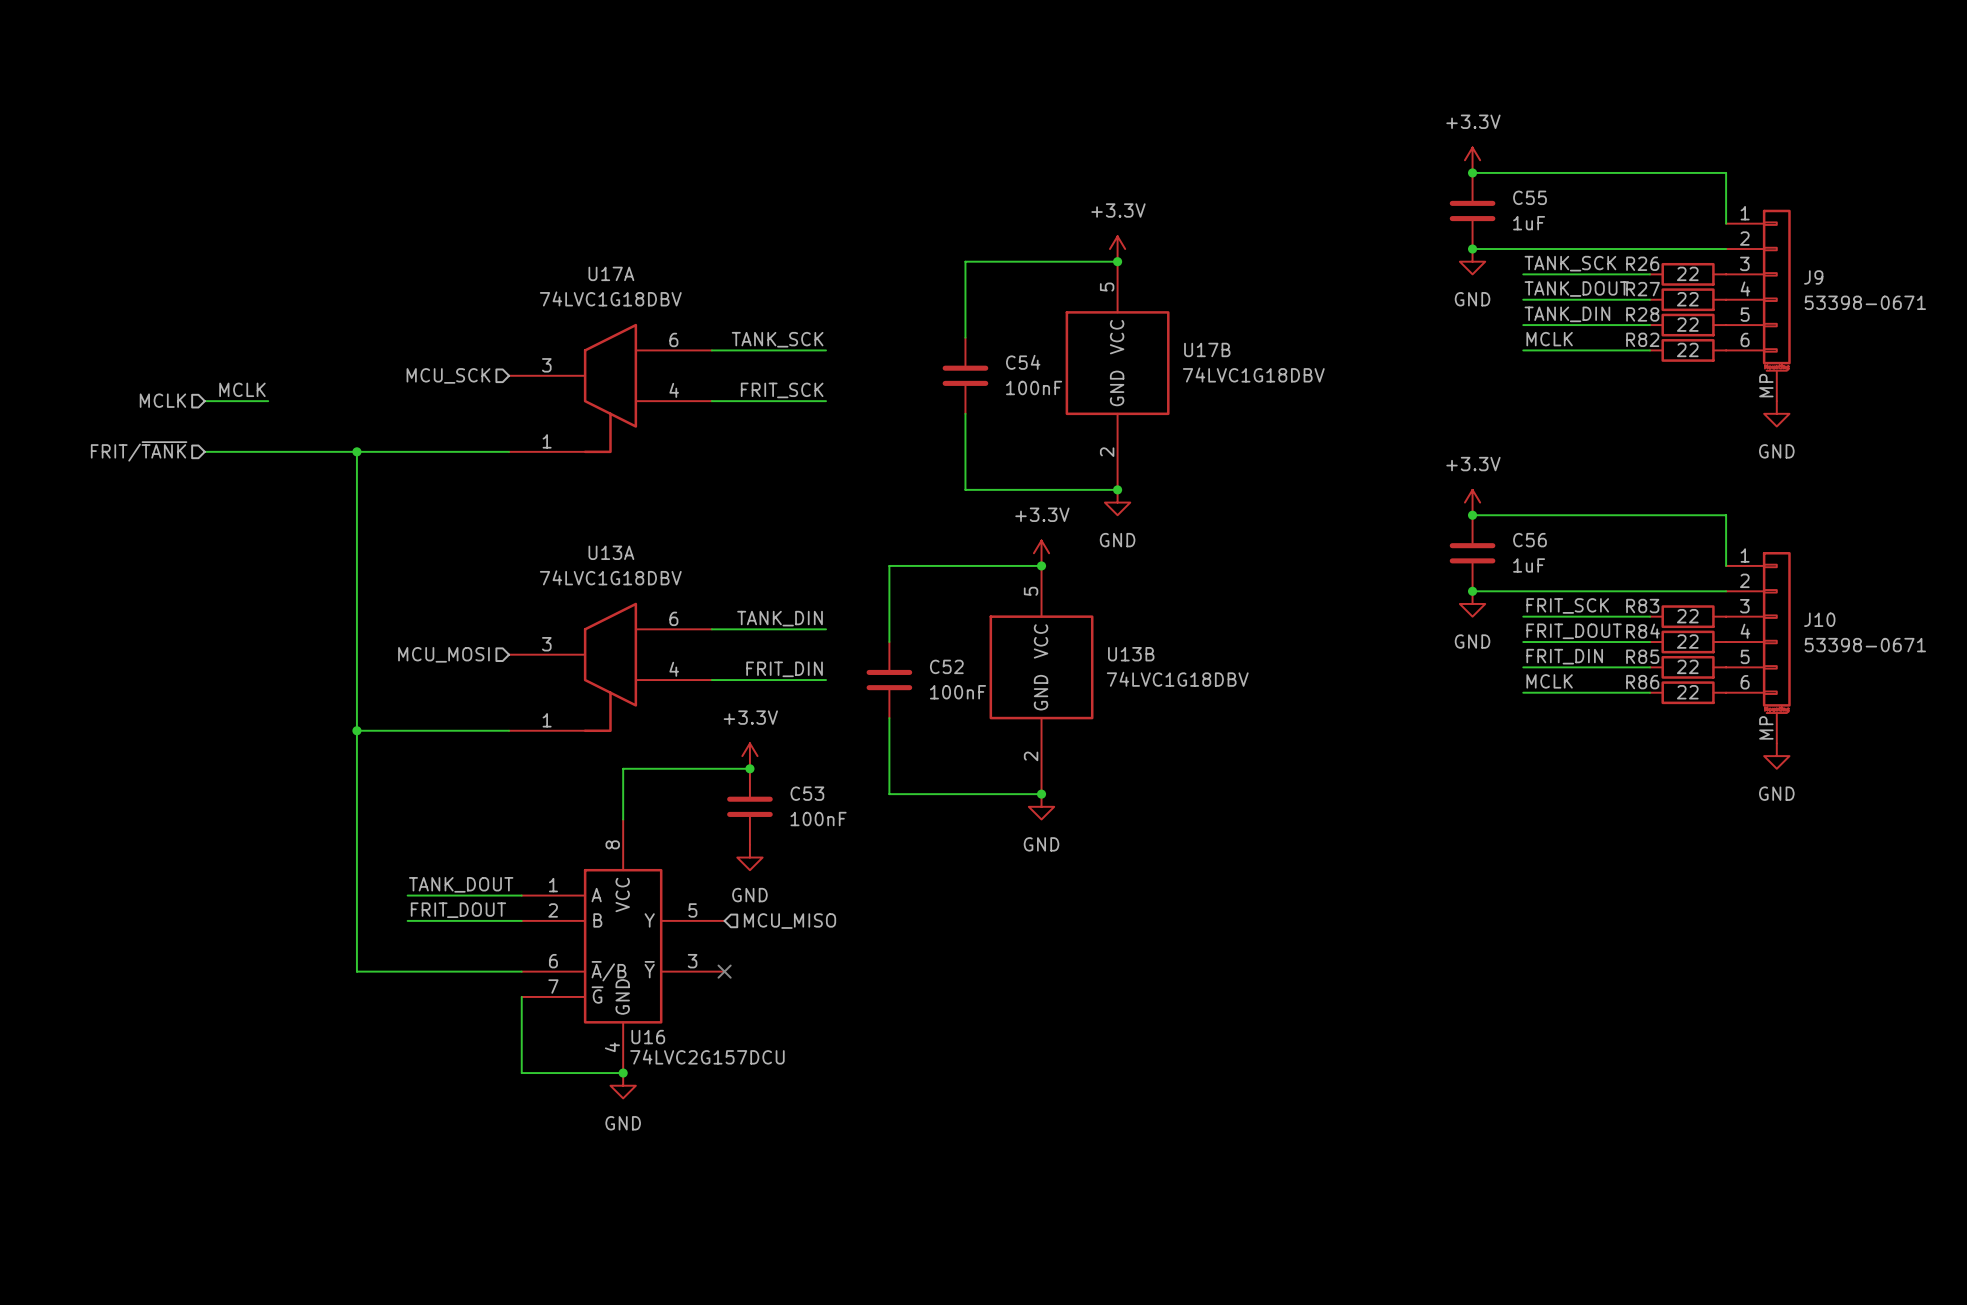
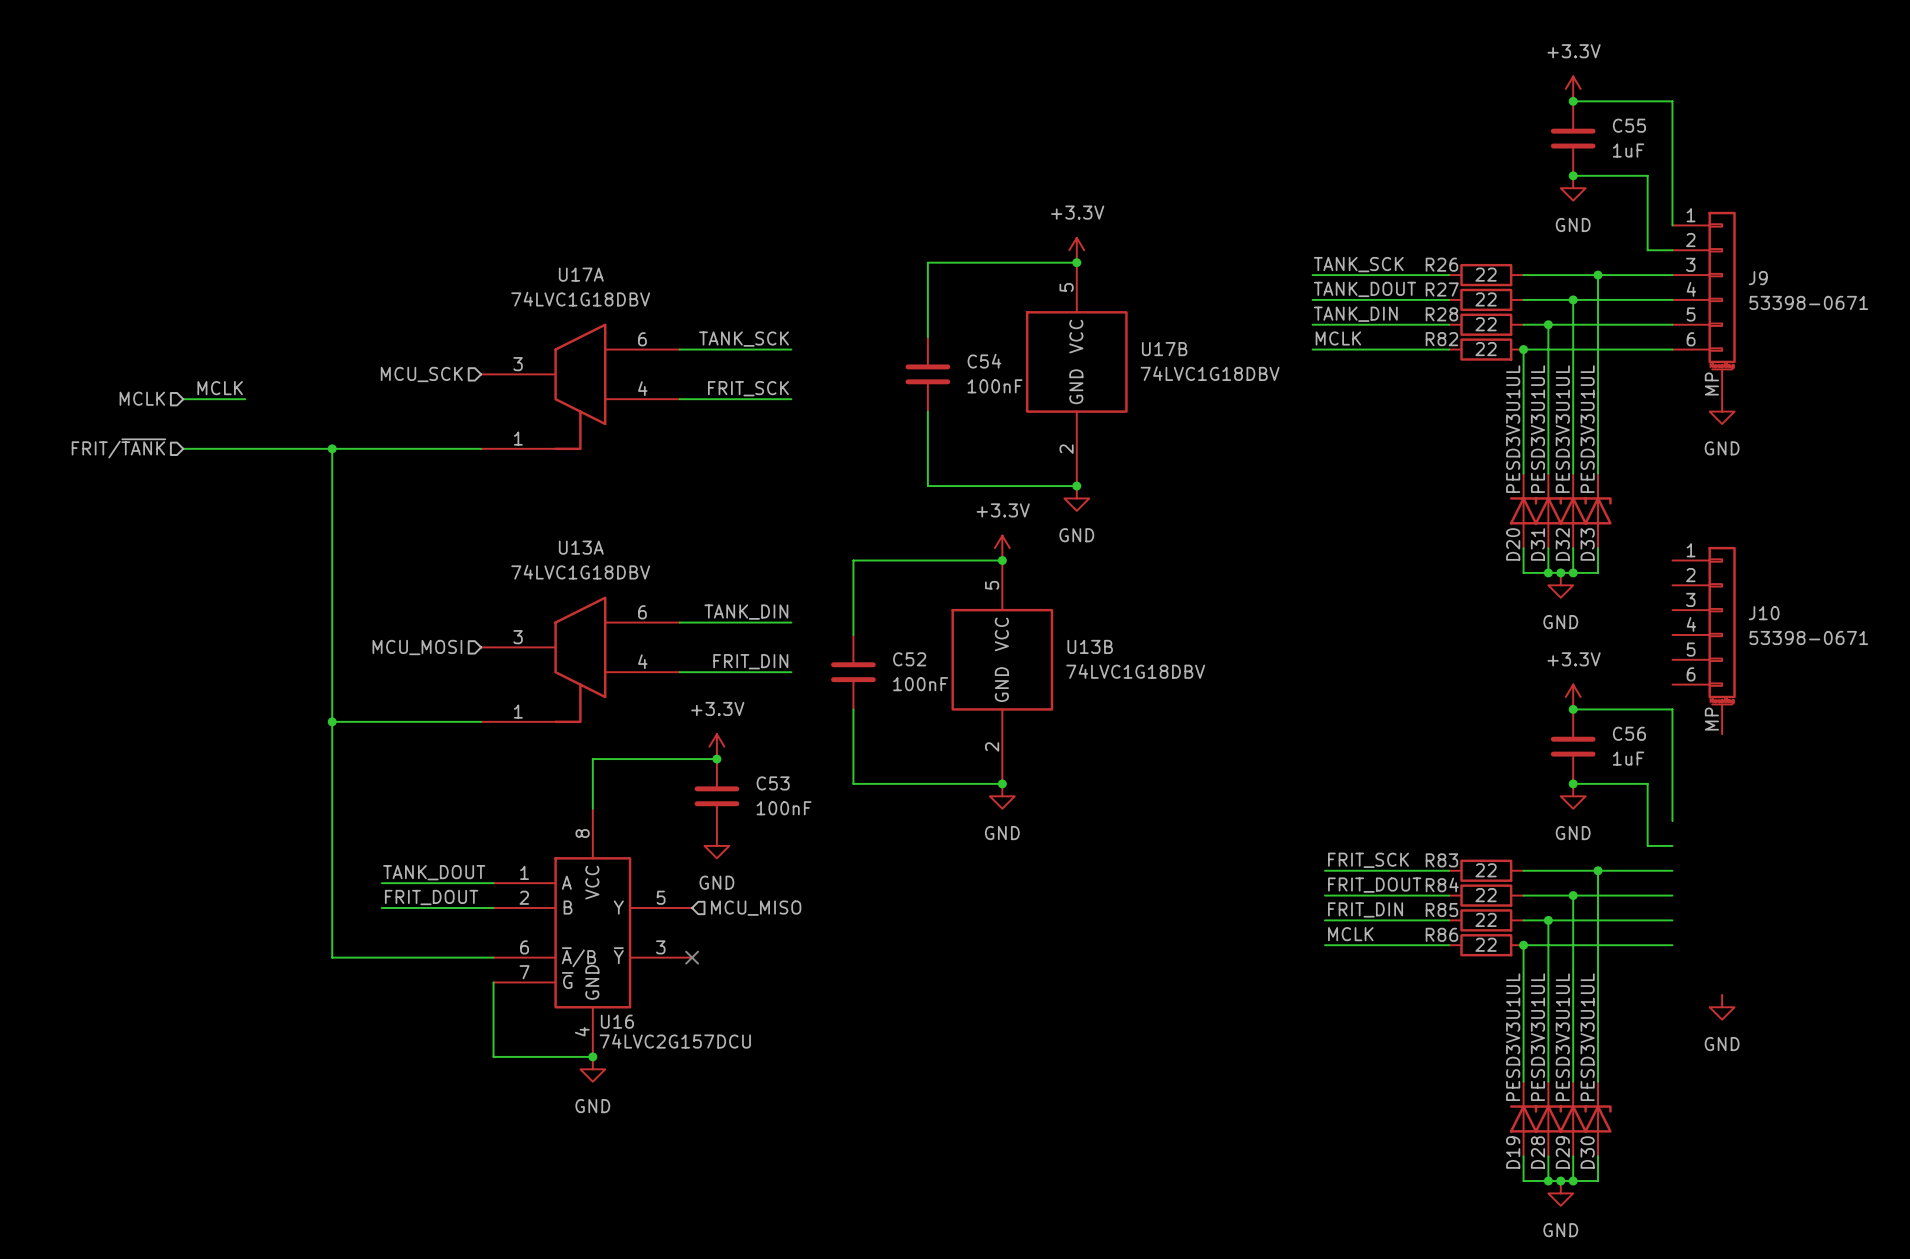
wire: none -> (1573, 101) (1672, 101) (1672, 175)
junction: none -> (1573, 101)
power symbol position: +3.3V (1472, 160) -> +3.3V (1573, 88)
wire: (1472, 172) (1624, 172) -> none
junction: (1472, 172) -> none
junction: none -> (1573, 175)
wire: (1700, 172) (1726, 172) -> (1647, 175) (1647, 250)
C55 position: (1472, 210) -> (1573, 138)
wire: (1472, 249) (1700, 249) -> none
junction: (1472, 249) -> none
power symbol position: GND (1472, 261) -> GND (1573, 188)
label position: TANK_SCK (1570, 263) -> TANK_SCK (1358, 264)
wire: none -> (1312, 275) (1449, 275)
wire: (1523, 274) (1573, 274) -> none
junction: none -> (1598, 275)
R26 position: (1688, 274) -> (1486, 275)
wire: none -> (1672, 275) (1598, 275) (1598, 473)
label position: TANK_DOUT (1576, 289) -> TANK_DOUT (1364, 289)
wire: none -> (1312, 299) (1449, 299)
wire: (1523, 299) (1573, 299) -> none
wire: none -> (1573, 299) (1573, 473)
junction: none -> (1573, 299)
wire: none -> (1598, 299) (1672, 299)
R27 position: (1688, 299) -> (1486, 299)
label position: TANK_DIN (1567, 314) -> TANK_DIN (1355, 314)
wire: none -> (1312, 324) (1449, 324)
wire: (1523, 325) (1573, 325) -> none
wire: none -> (1548, 324) (1548, 473)
junction: none -> (1548, 324)
wire: none -> (1598, 324) (1672, 324)
R28 position: (1688, 325) -> (1486, 324)
label position: MCLK (1549, 339) -> MCLK (1338, 338)
wire: none -> (1312, 349) (1449, 349)
wire: (1523, 350) (1573, 350) -> (1523, 473) (1523, 349)
junction: none -> (1523, 349)
wire: none -> (1598, 349) (1672, 349)
R82 position: (1688, 350) -> (1486, 349)
power symbol: +3.3V (1472, 502) -> none
wire: (1472, 515) (1726, 515) (1726, 565) -> none
junction: (1472, 515) -> none
D20: none -> PESD3V3U1UL (1523, 510)
D31: none -> PESD3V3U1UL (1548, 510)
D32: none -> PESD3V3U1UL (1573, 510)
D33: none -> PESD3V3U1UL (1598, 510)
C56 position: (1472, 553) -> (1573, 746)
wire: none -> (1523, 548) (1523, 572) (1598, 572) (1598, 548)
wire: none -> (1548, 548) (1548, 572)
wire: none -> (1573, 548) (1573, 572)
junction: none -> (1548, 572)
junction: none -> (1560, 572)
junction: none -> (1573, 572)
wire: (1472, 591) (1726, 591) -> none
junction: (1472, 591) -> none
power symbol: none -> GND (1560, 585)
power symbol: GND (1472, 603) -> none
label: FRIT_SCK (1567, 605) -> none
wire: (1523, 616) (1650, 616) -> none
R83 position: (1688, 616) -> (1486, 870)
label: FRIT_DOUT (1574, 631) -> none
wire: (1523, 642) (1650, 642) -> none
R84 position: (1688, 642) -> (1486, 895)
label: FRIT_DIN (1564, 656) -> none
wire: (1523, 667) (1650, 667) -> none
R85 position: (1688, 667) -> (1486, 920)
label: MCLK (1549, 681) -> none
wire: (1523, 692) (1650, 692) -> (1325, 870) (1449, 870)
R86 position: (1688, 692) -> (1486, 945)
power symbol: none -> +3.3V (1573, 697)
wire: none -> (1573, 709) (1672, 709) (1672, 821)
junction: none -> (1573, 709)
power symbol: GND (1776, 756) -> none
wire: none -> (1573, 783) (1647, 783) (1647, 845) (1672, 845)
junction: none -> (1573, 783)
power symbol: none -> GND (1573, 796)
label: none -> FRIT_SCK (1368, 860)
wire: none -> (1523, 870) (1672, 870)
wire: none -> (1598, 870) (1598, 1081)
junction: none -> (1598, 870)
label: none -> FRIT_DOUT (1374, 885)
wire: none -> (1325, 895) (1449, 895)
wire: none -> (1523, 895) (1672, 895)
wire: none -> (1573, 895) (1573, 1081)
junction: none -> (1573, 895)
label: none -> FRIT_DIN (1365, 909)
wire: none -> (1325, 920) (1449, 920)
wire: none -> (1523, 920) (1672, 920)
wire: none -> (1548, 920) (1548, 1081)
junction: none -> (1548, 920)
label: none -> MCLK (1350, 934)
wire: none -> (1325, 945) (1449, 945)
junction: none -> (1523, 945)
wire: none -> (1672, 945) (1523, 945) (1523, 1081)
power symbol: none -> GND (1722, 1007)
D19: none -> PESD3V3U1UL (1523, 1118)
D28: none -> PESD3V3U1UL (1548, 1118)
D29: none -> PESD3V3U1UL (1573, 1118)
D30: none -> PESD3V3U1UL (1598, 1118)
wire: none -> (1523, 1156) (1523, 1181) (1598, 1181) (1598, 1156)
wire: none -> (1548, 1156) (1548, 1181)
wire: none -> (1573, 1156) (1573, 1181)
junction: none -> (1548, 1181)
junction: none -> (1560, 1181)
junction: none -> (1573, 1181)
power symbol: none -> GND (1560, 1193)

